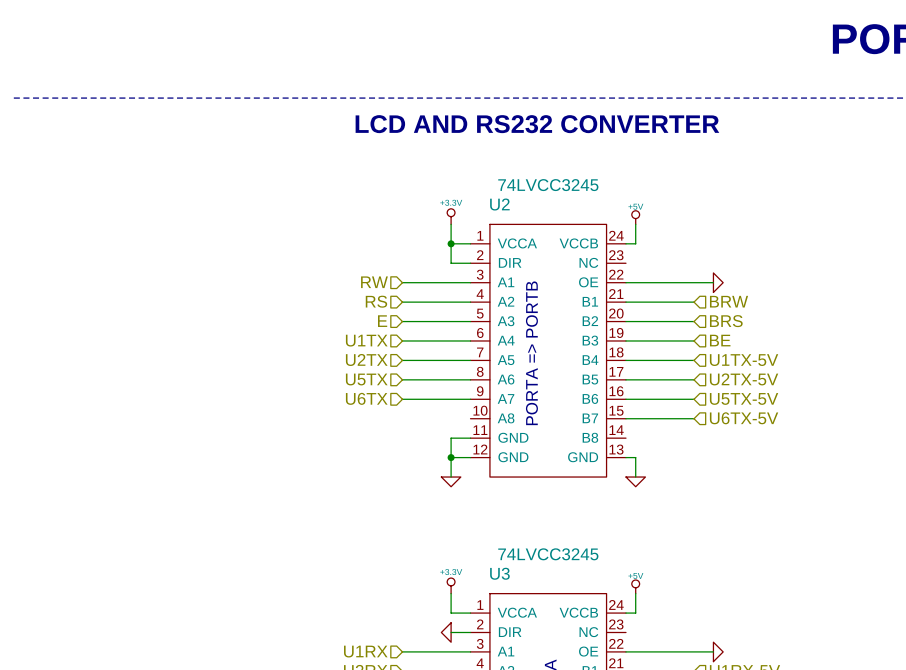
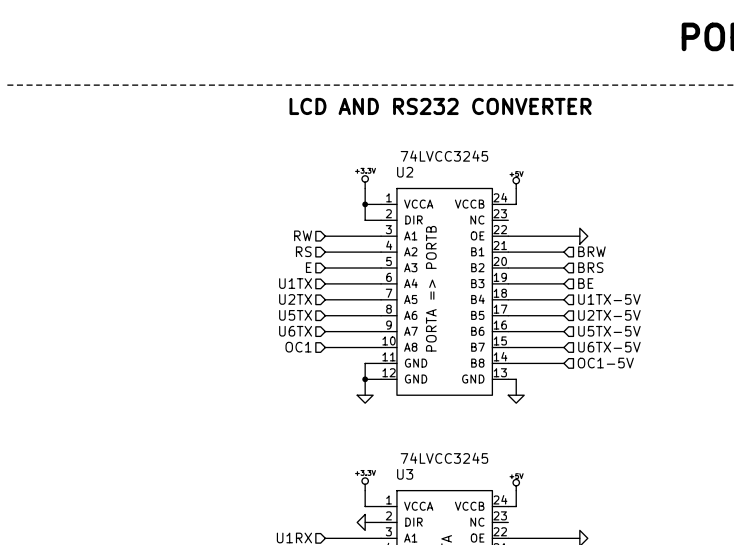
hierarchical label: none -> OC1 (298, 347)
wire: none -> (325, 347) (381, 347)
hierarchical label: none -> OC1-5V (605, 363)
wire: none -> (508, 363) (563, 363)

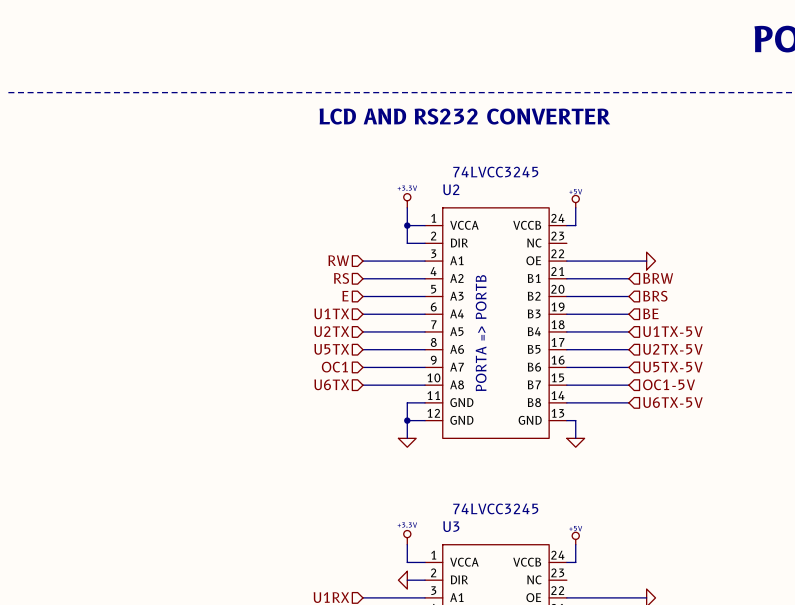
hierarchical label: U6TX (295, 331) -> OC1 (334, 367)
hierarchical label: OC1 (298, 347) -> U6TX (331, 384)
hierarchical label: U6TX-5V (609, 347) -> OC1-5V (669, 384)
hierarchical label: OC1-5V (605, 363) -> U6TX-5V (672, 402)

